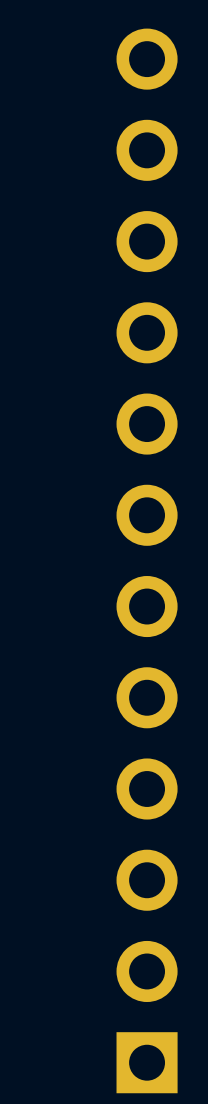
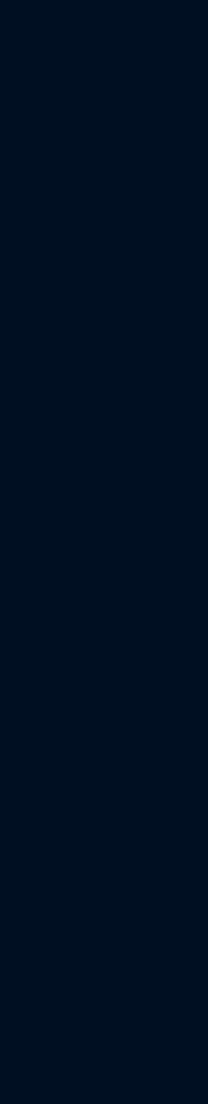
part: (147, 560) -> none

